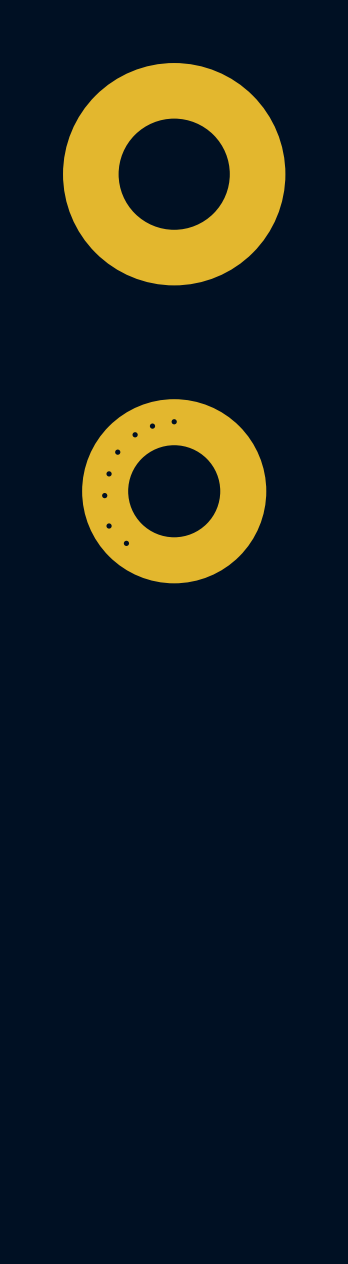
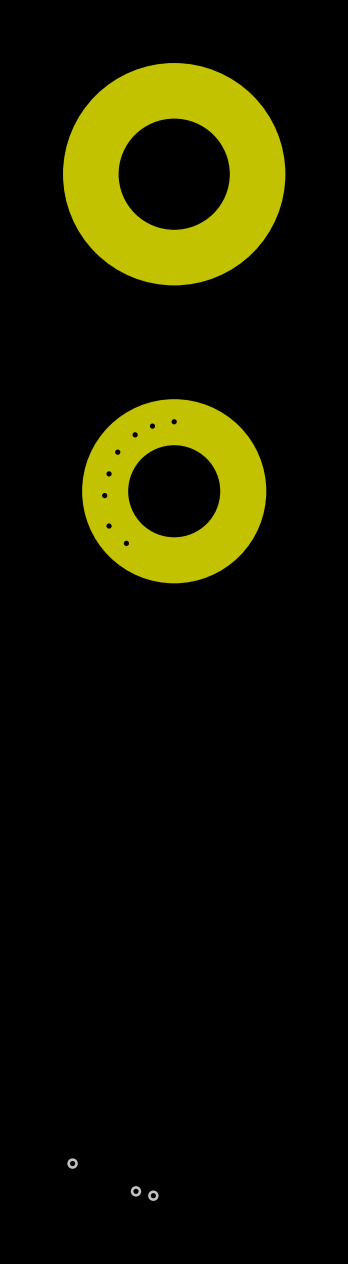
via: none -> (72, 1163)
via: none -> (135, 1191)
via: none -> (153, 1195)

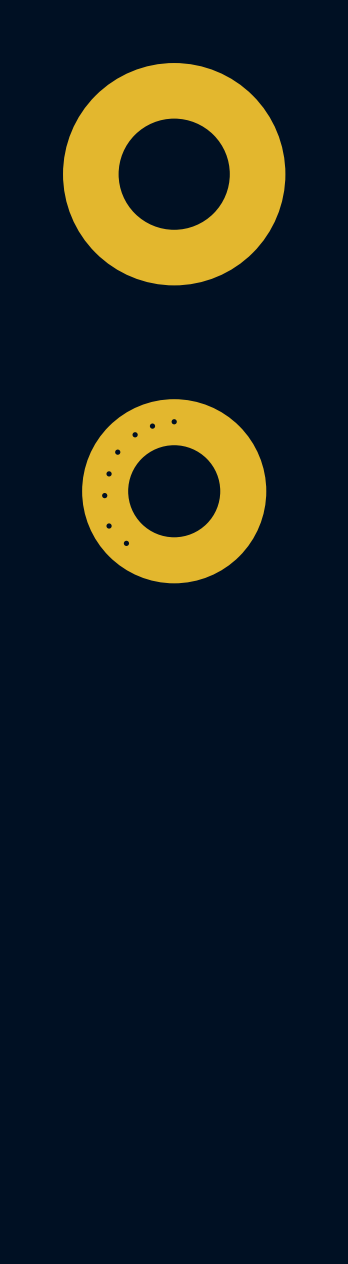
via: (72, 1163) -> none
via: (135, 1191) -> none
via: (153, 1195) -> none

